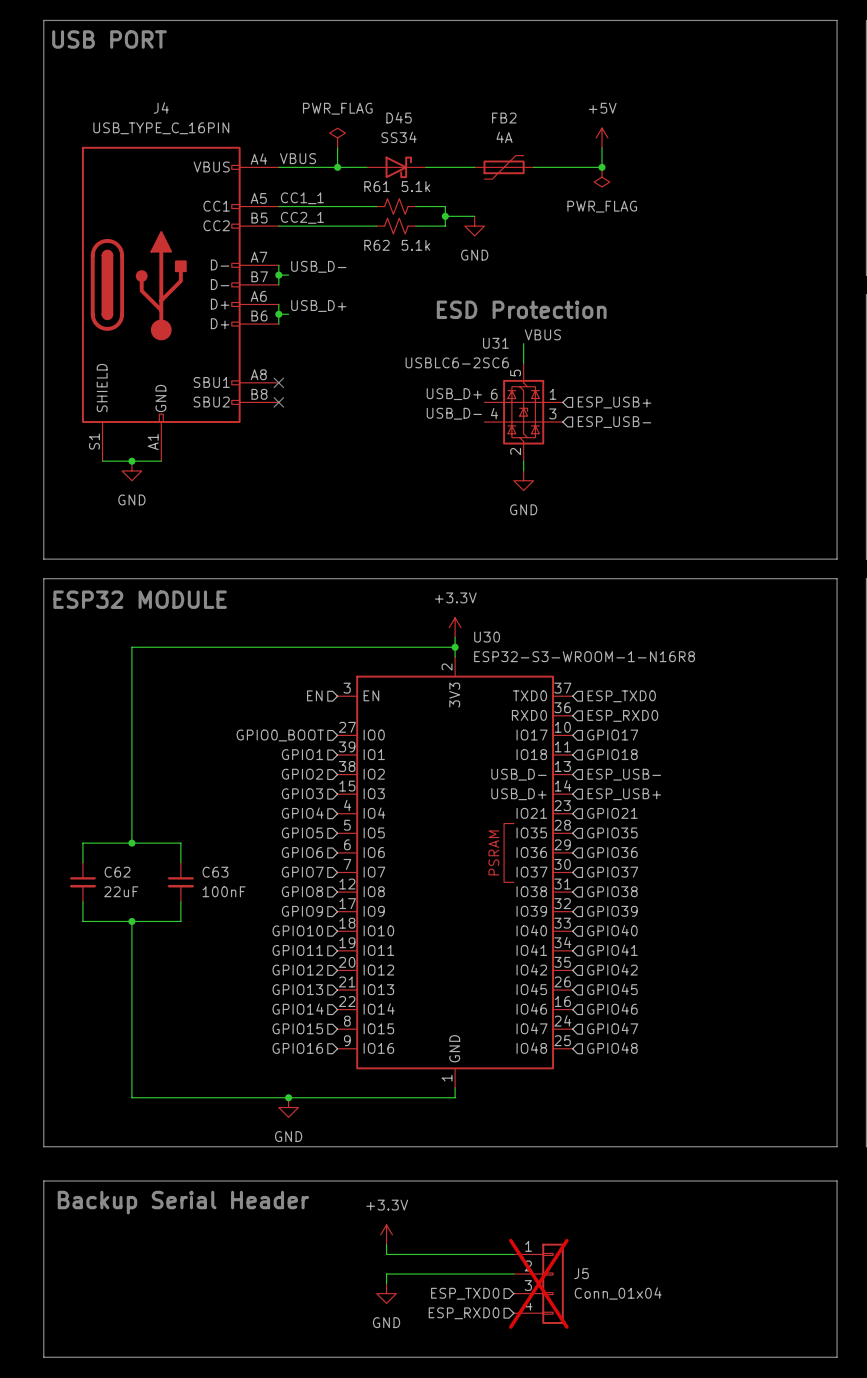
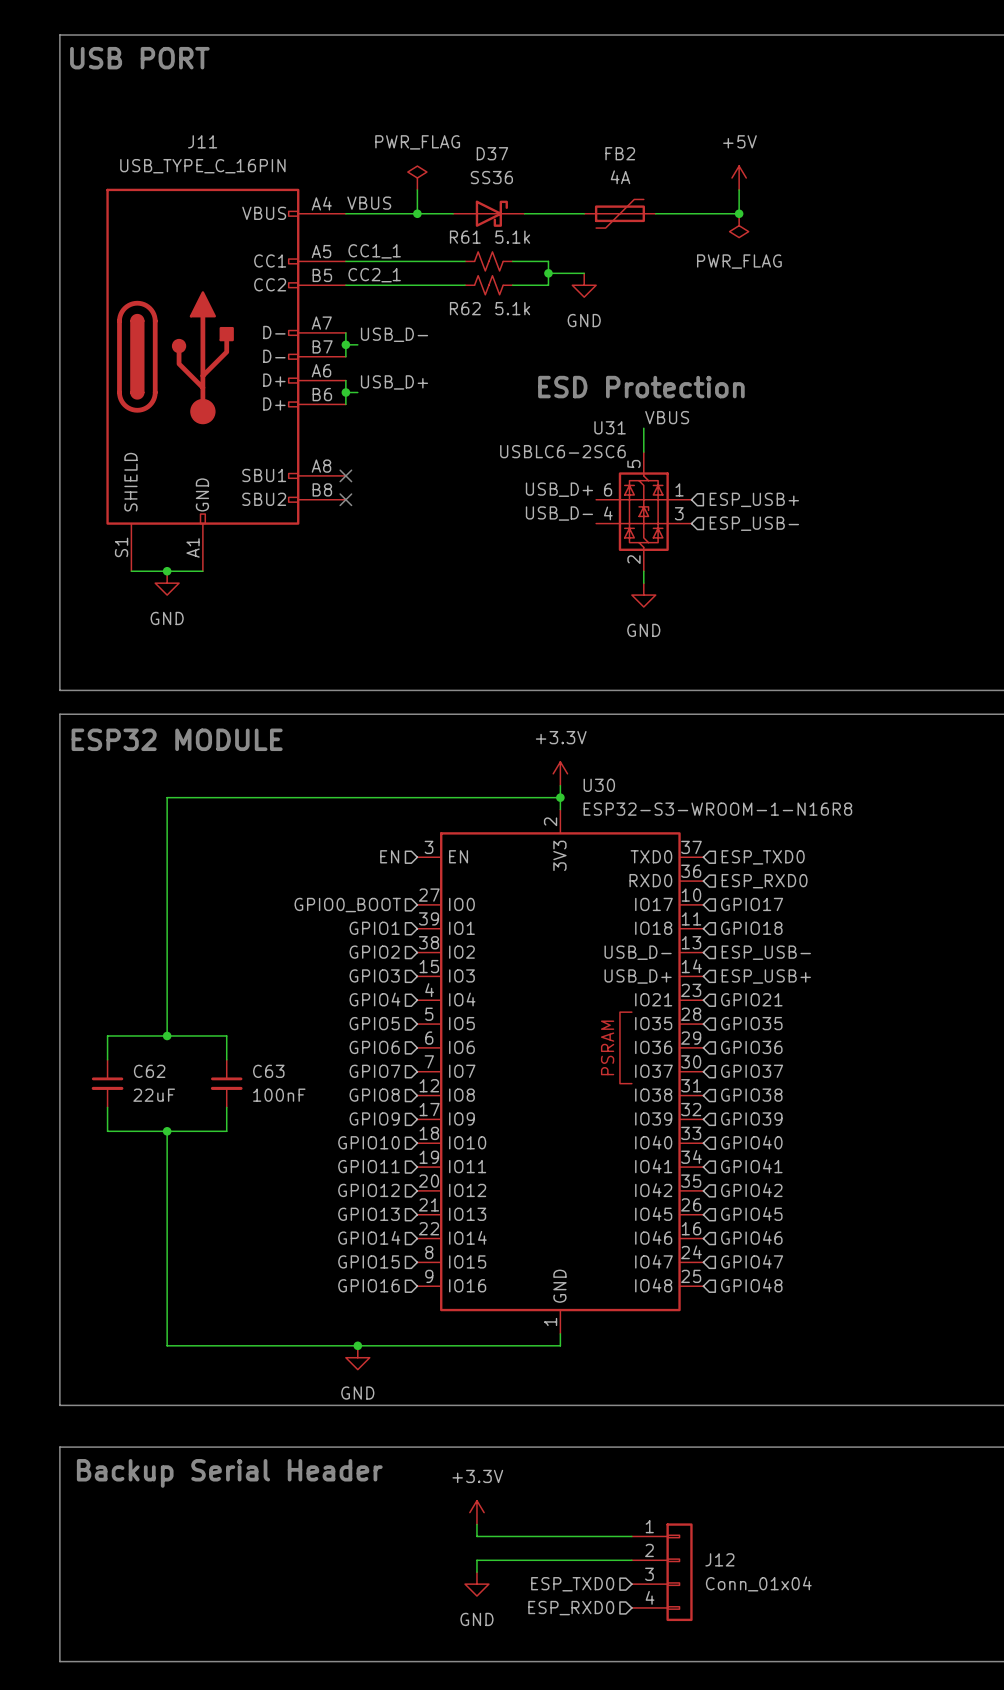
J4 name: J4 (161, 108) -> J11 (202, 141)
D45 name: D45 (399, 117) -> D37 (492, 153)
D45 value: SS34 (399, 137) -> SS36 (491, 177)
J5 name: J5 (581, 1273) -> J12 (719, 1559)
J5 do-not-place cross: (538, 1283) -> none

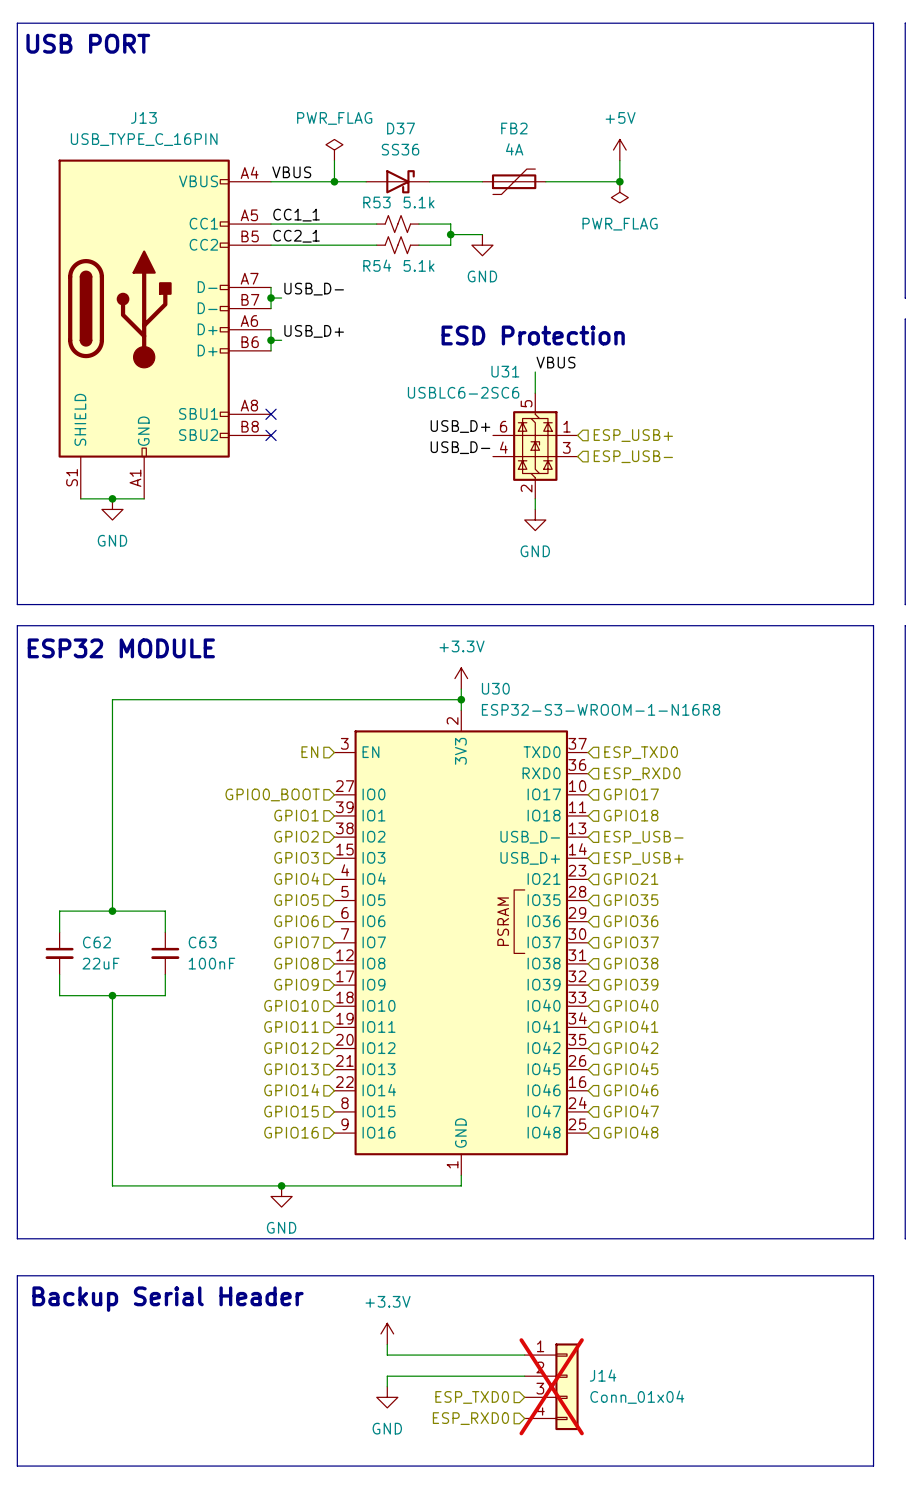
J11 name: J11 (202, 141) -> J13 (143, 117)
R61 name: R61 (465, 237) -> R53 (376, 202)
R62 name: R62 (465, 308) -> R54 (377, 265)
J12 name: J12 (719, 1559) -> J14 (603, 1375)
J12 do-not-place cross: none -> (551, 1386)

